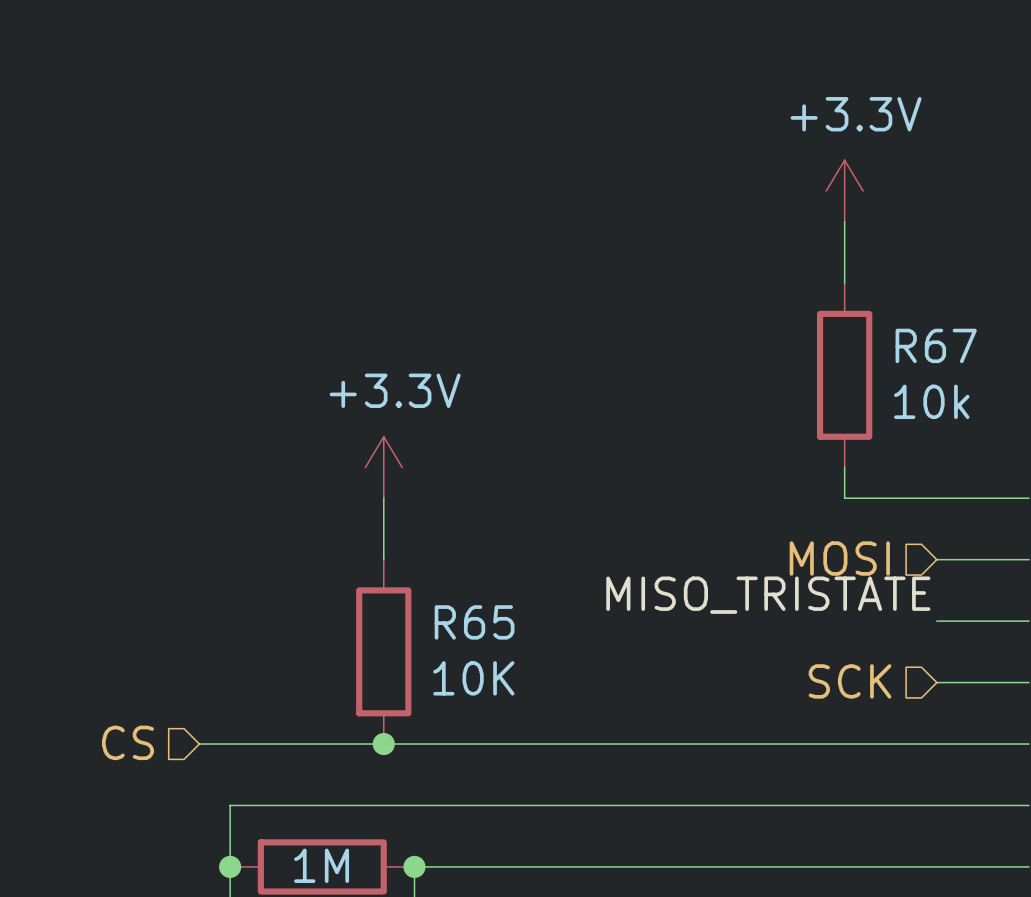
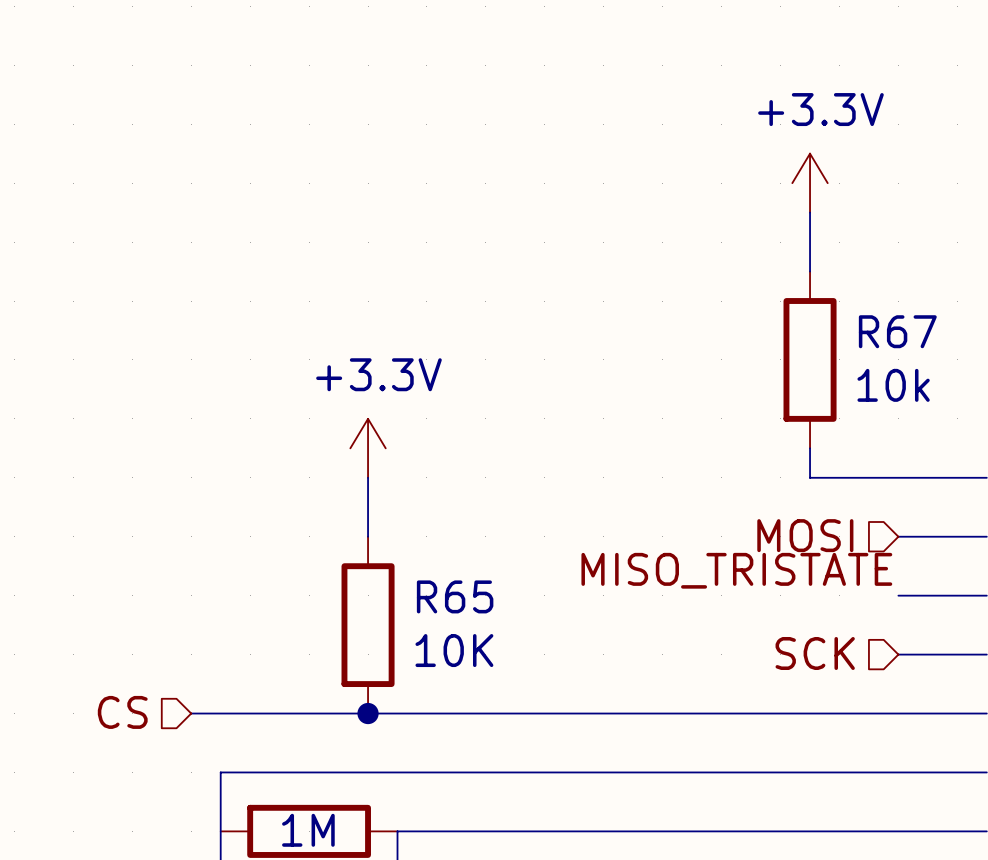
junction: (230, 866) -> none
junction: (414, 866) -> none

